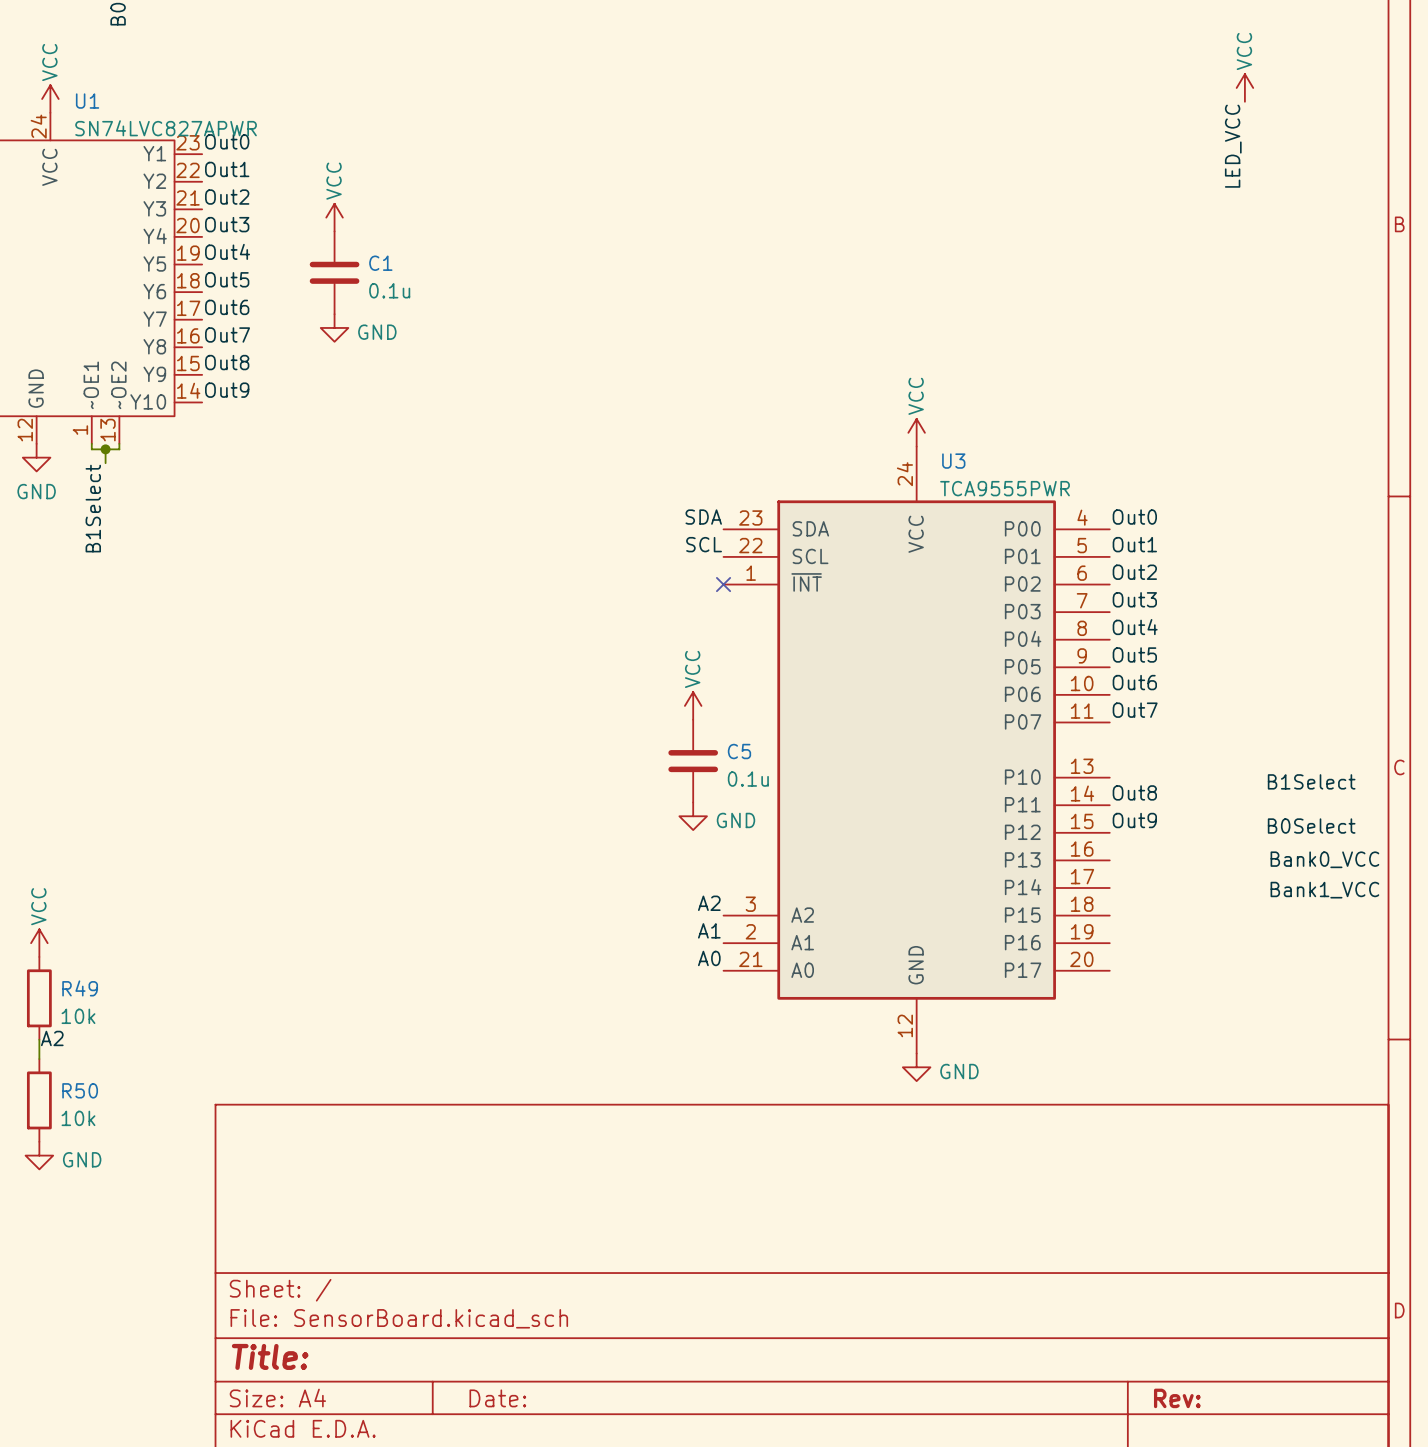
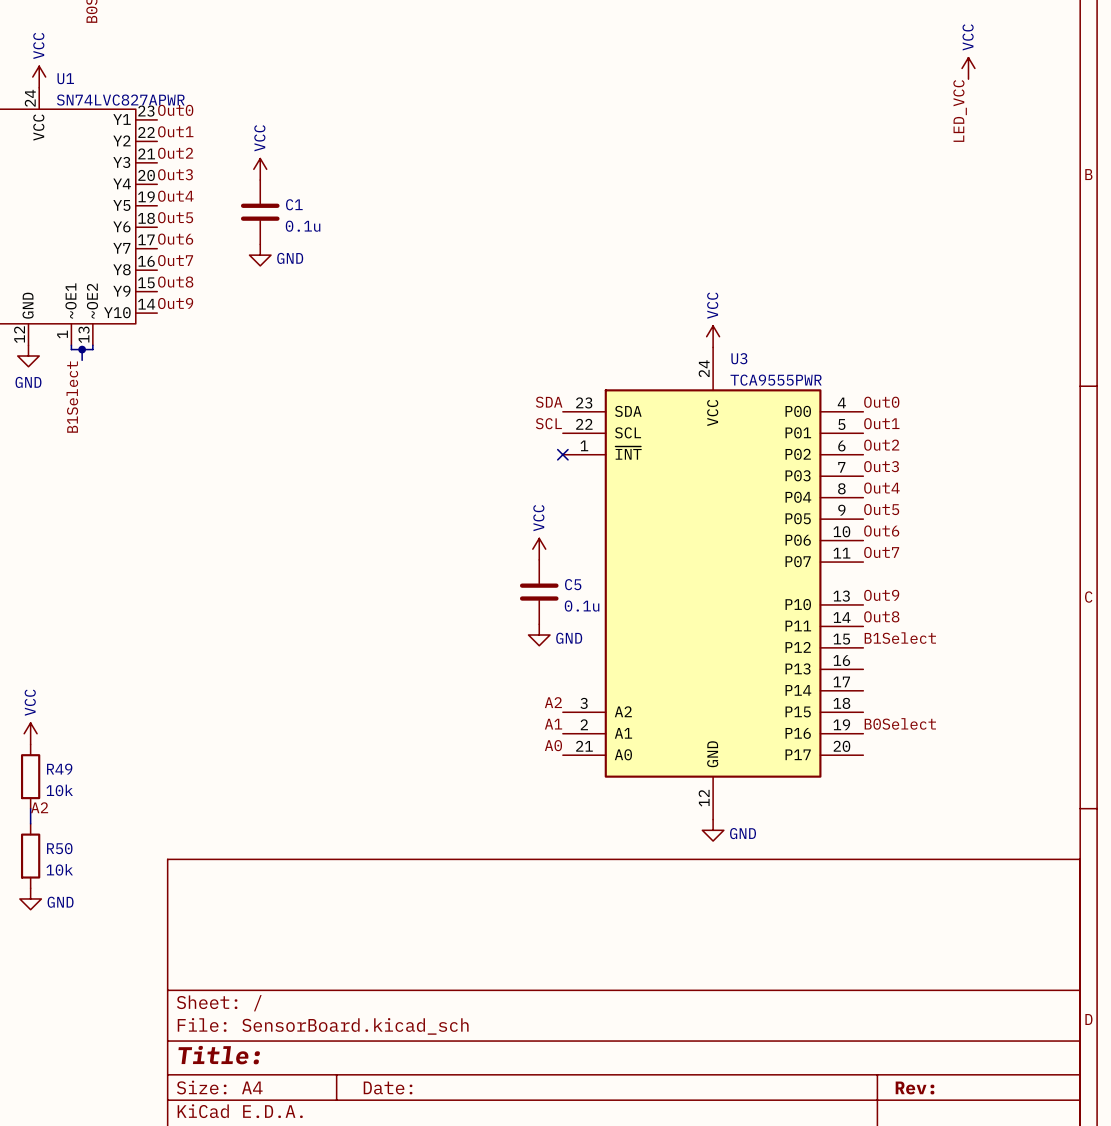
label: none -> Out9 (881, 595)
label: B1Select (1311, 781) -> none
label: Out9 (1134, 820) -> B1Select (900, 638)
label position: B0Select (1311, 826) -> B0Select (900, 723)
label: Bank0_VCC (1324, 859) -> none
label: Bank1_VCC (1324, 890) -> none

